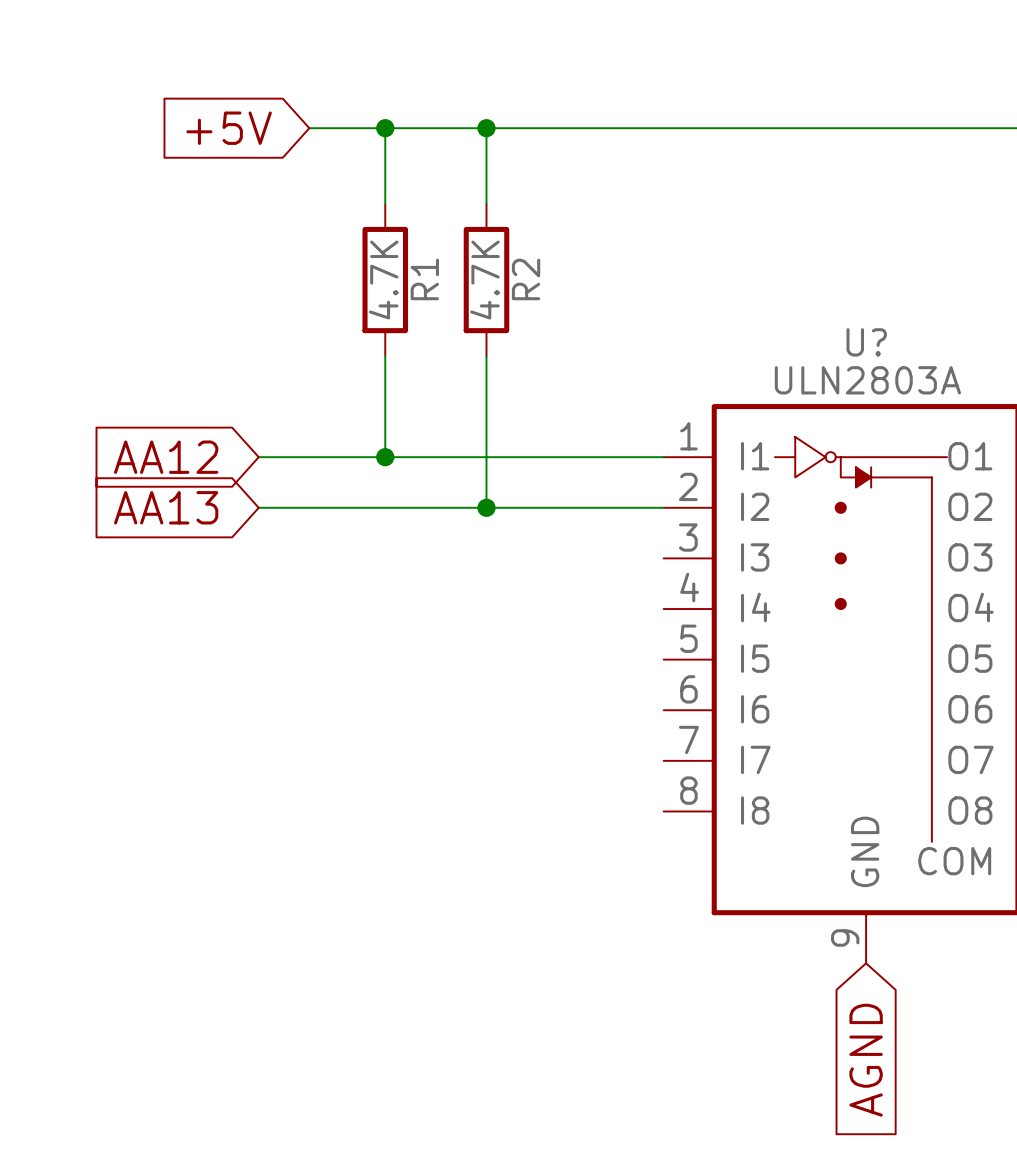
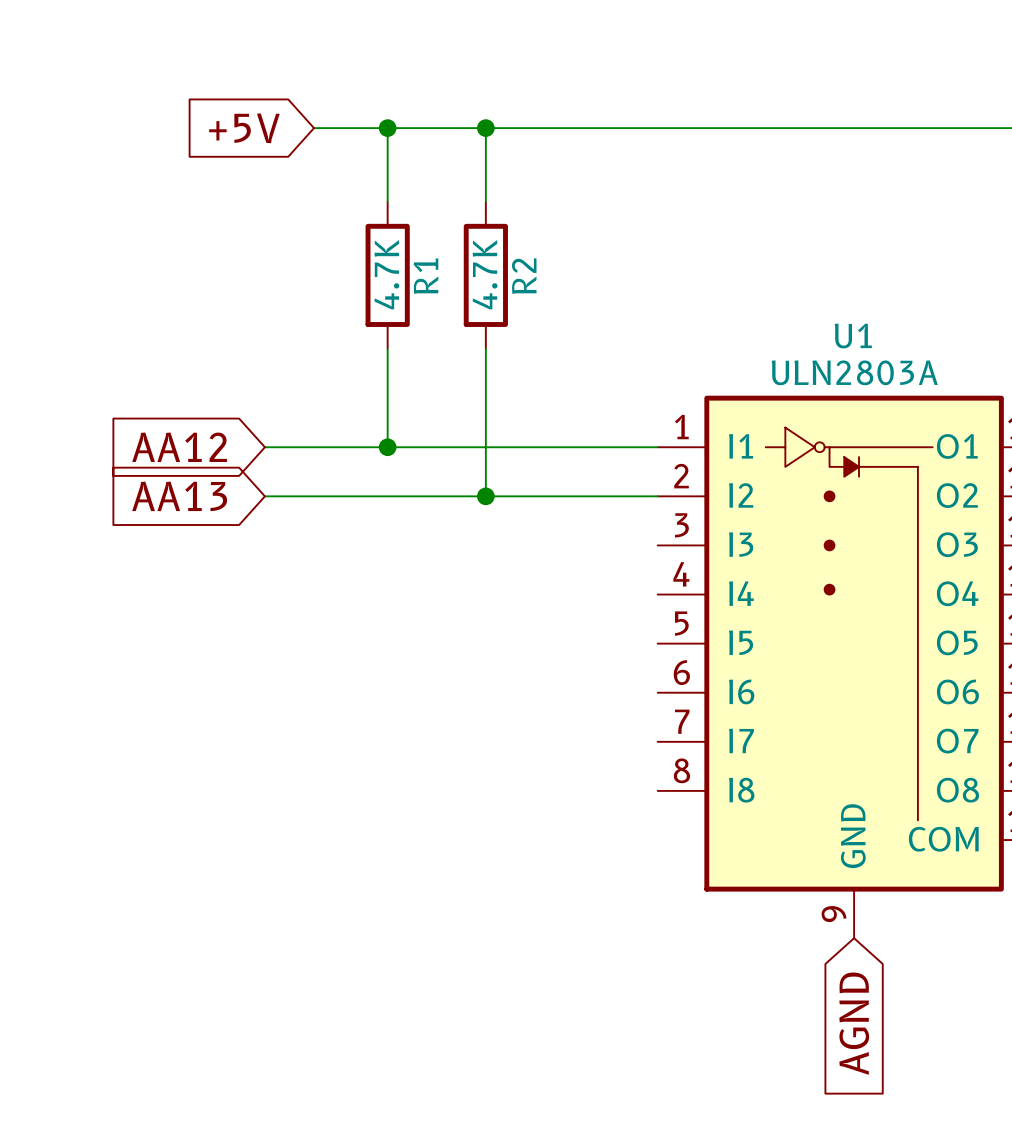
U? name: U? (866, 342) -> U1 (853, 335)

